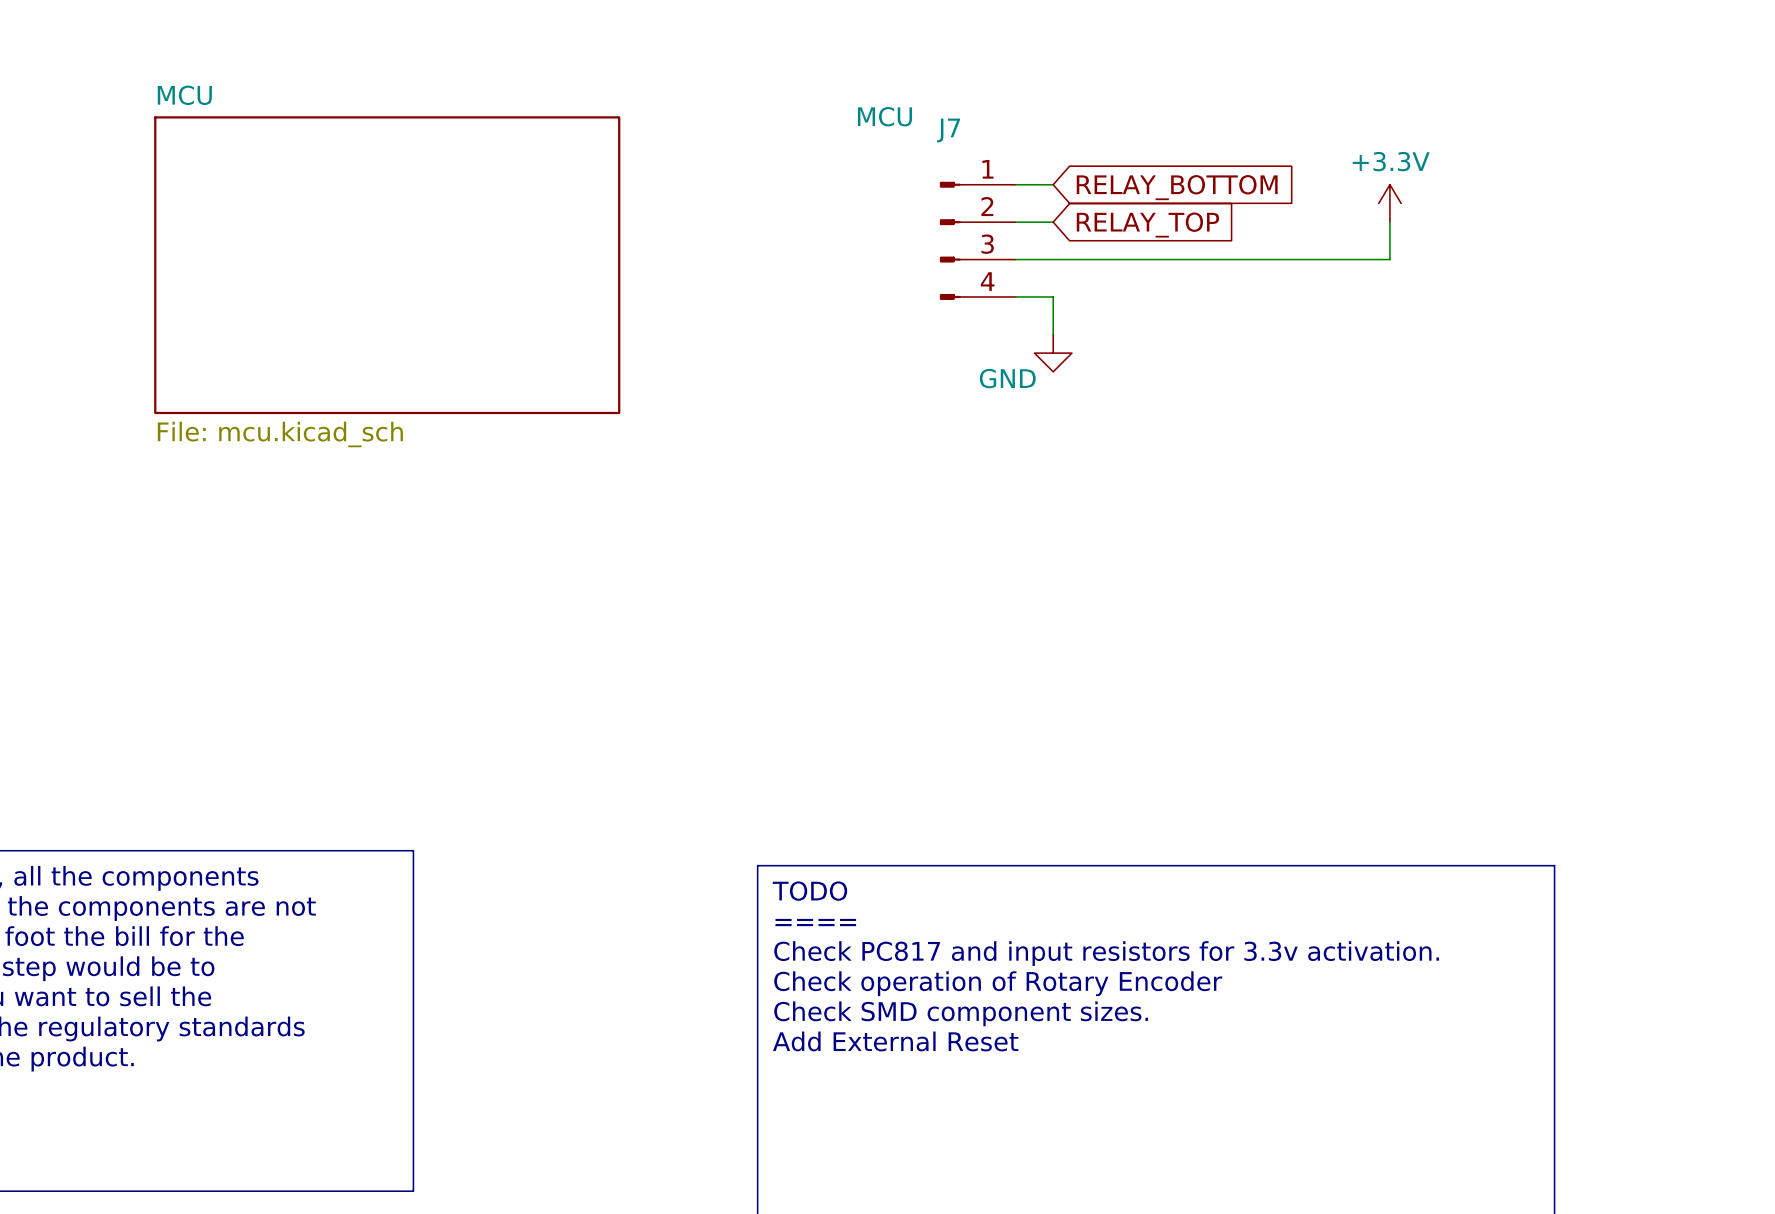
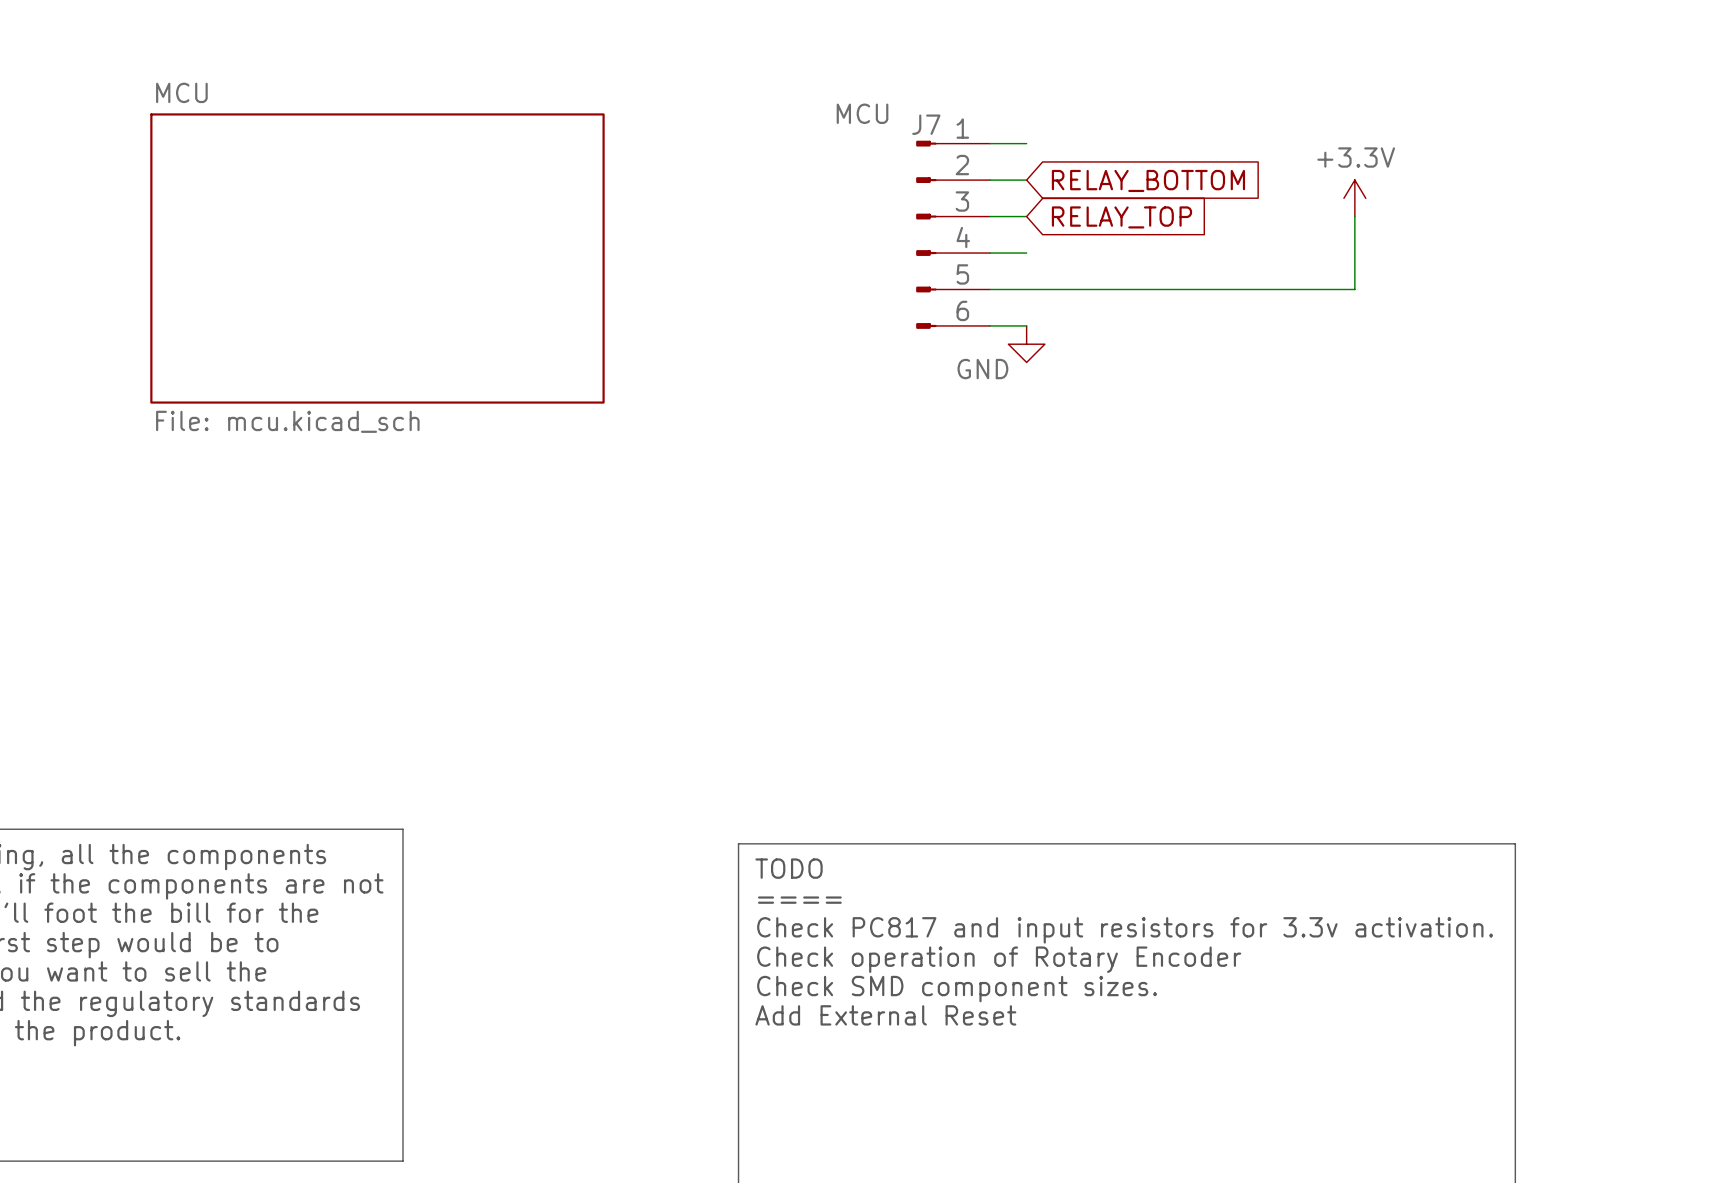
wire: none -> (990, 143) (1026, 143)
J7 symbol: [939, 181, 1016, 300] -> [916, 140, 991, 329]
wire: (1053, 259) (1389, 259) -> (1026, 289) (1354, 289) (1354, 253)
wire: (1053, 296) (1053, 334) -> (990, 325) (1026, 325)

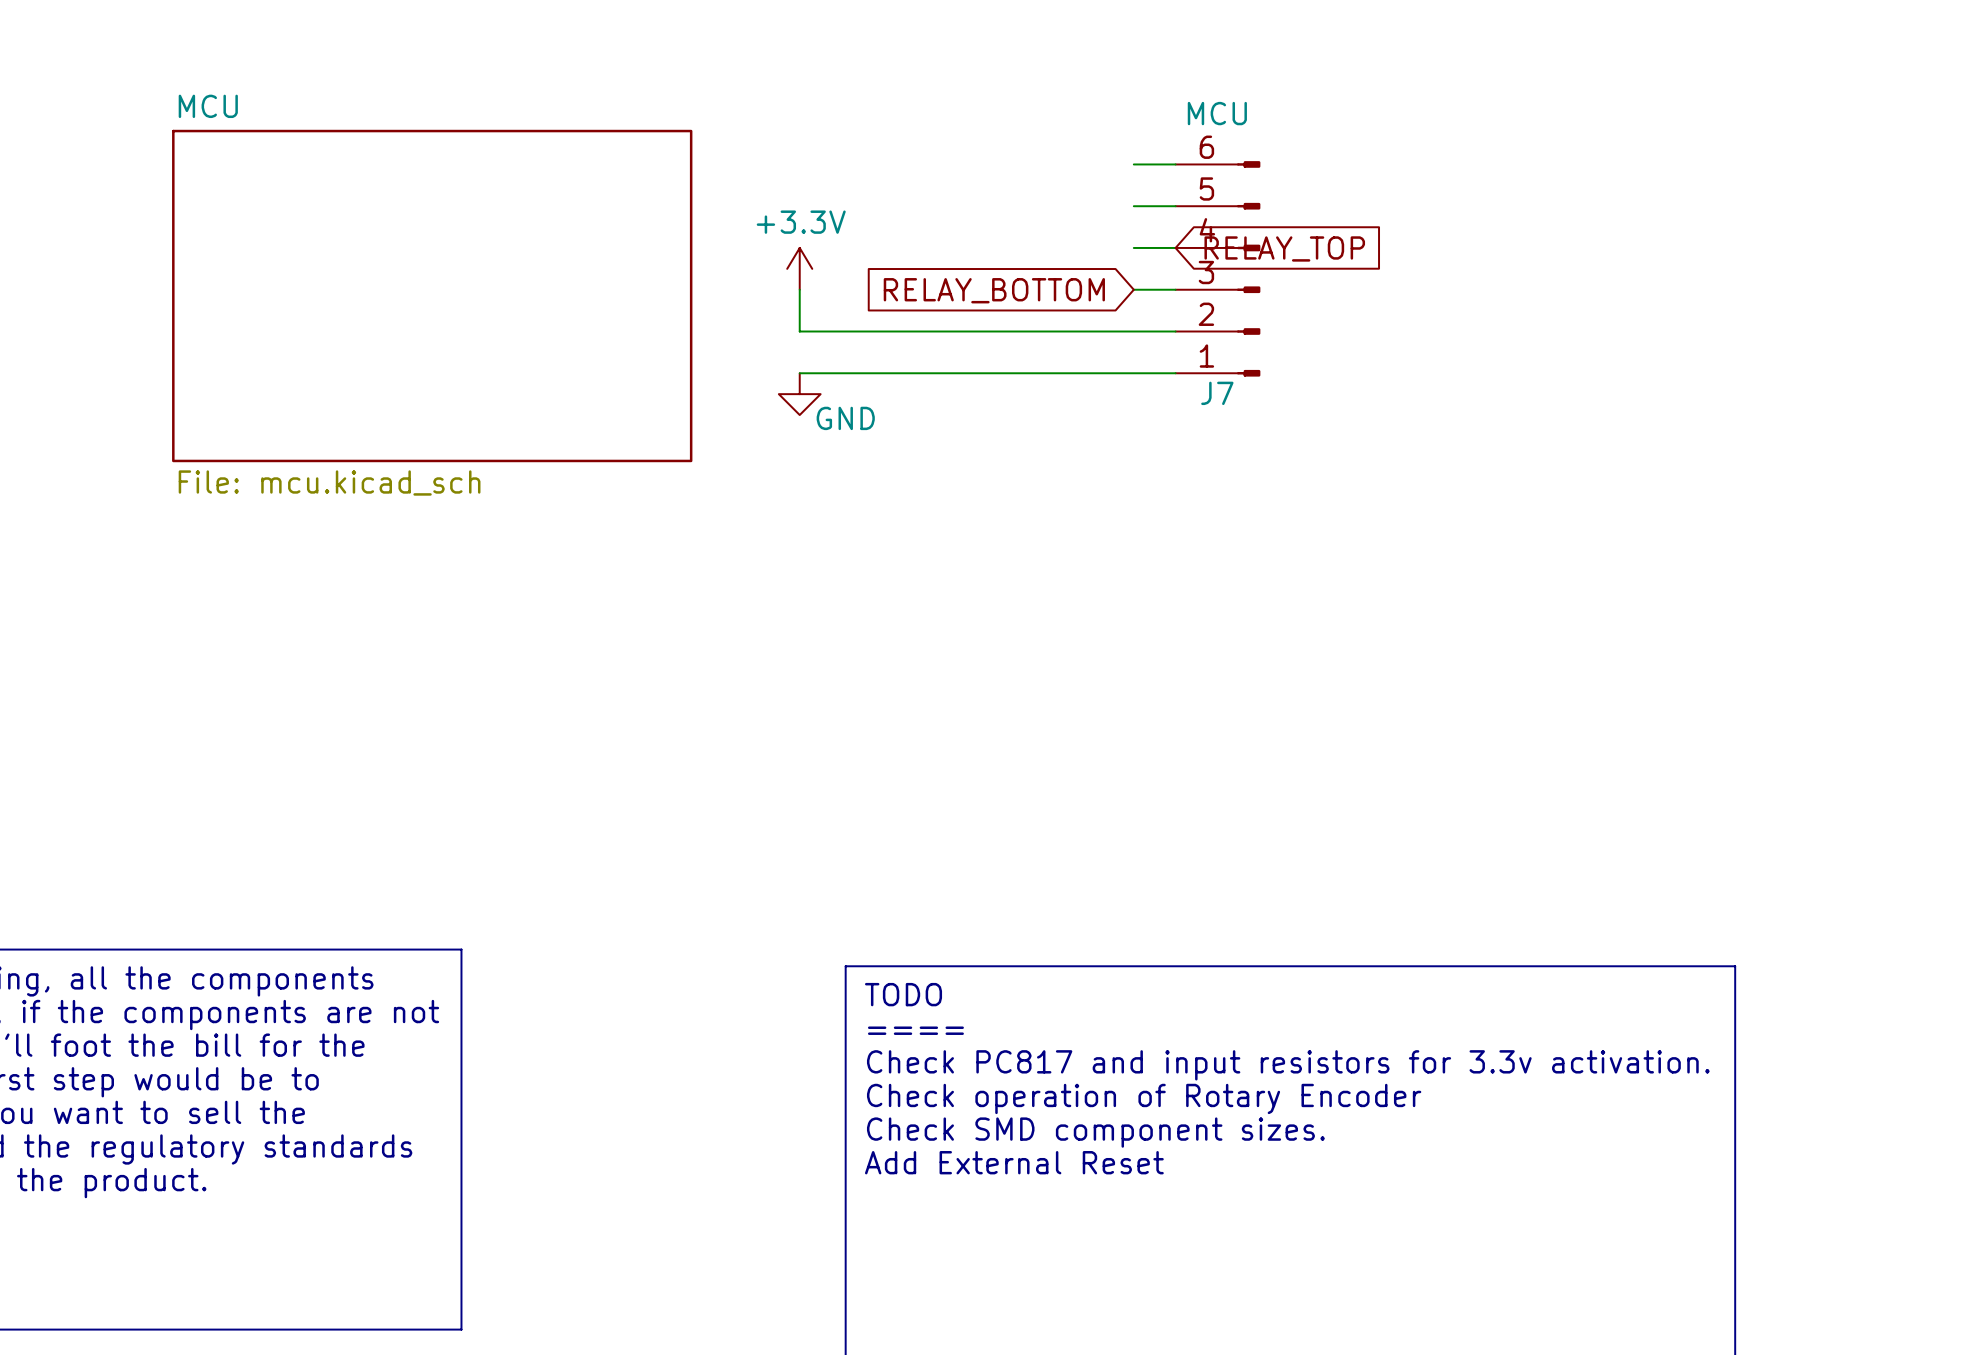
J7 value position: MCU (862, 113) -> MCU (1217, 113)
global label rotation: 0° (1148, 180) -> 180° (994, 290)
global label position: RELAY_BOTTOM (1148, 180) -> RELAY_BOTTOM (994, 290)
power symbol: +3.3V (1354, 198) -> none
wire: (1354, 216) (1354, 289) (1026, 289) -> none
power symbol: none -> +3.3V (799, 268)
J7 rotation: 0° (926, 234) -> 180° (1248, 268)
wire: none -> (799, 289) (799, 331) (1133, 331)
wire: none -> (799, 373) (1133, 373)
power symbol position: GND (1026, 344) -> GND (799, 394)
power symbol text position: GND (982, 369) -> GND (845, 418)

